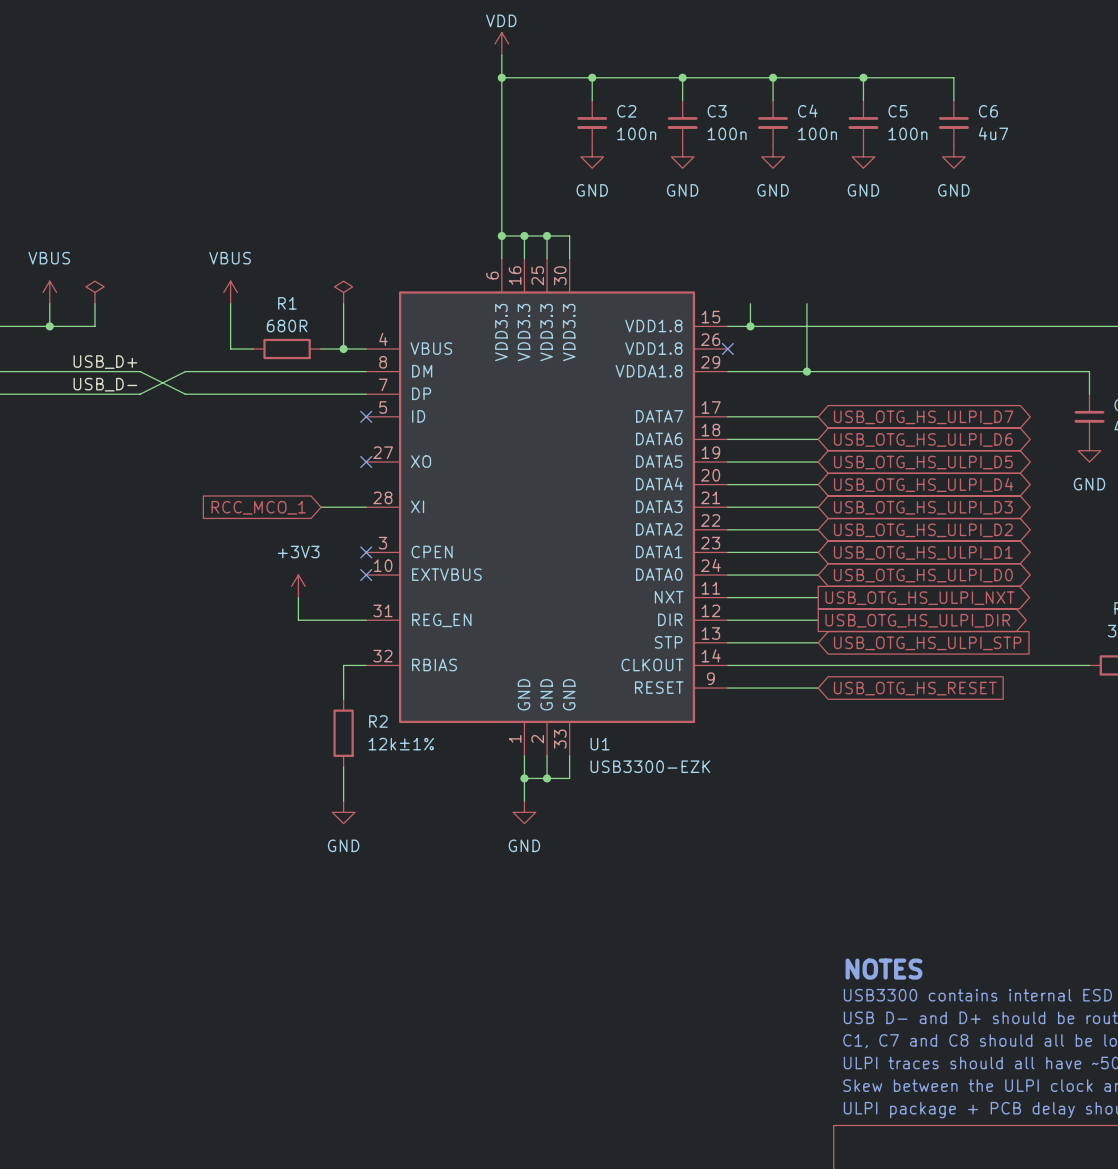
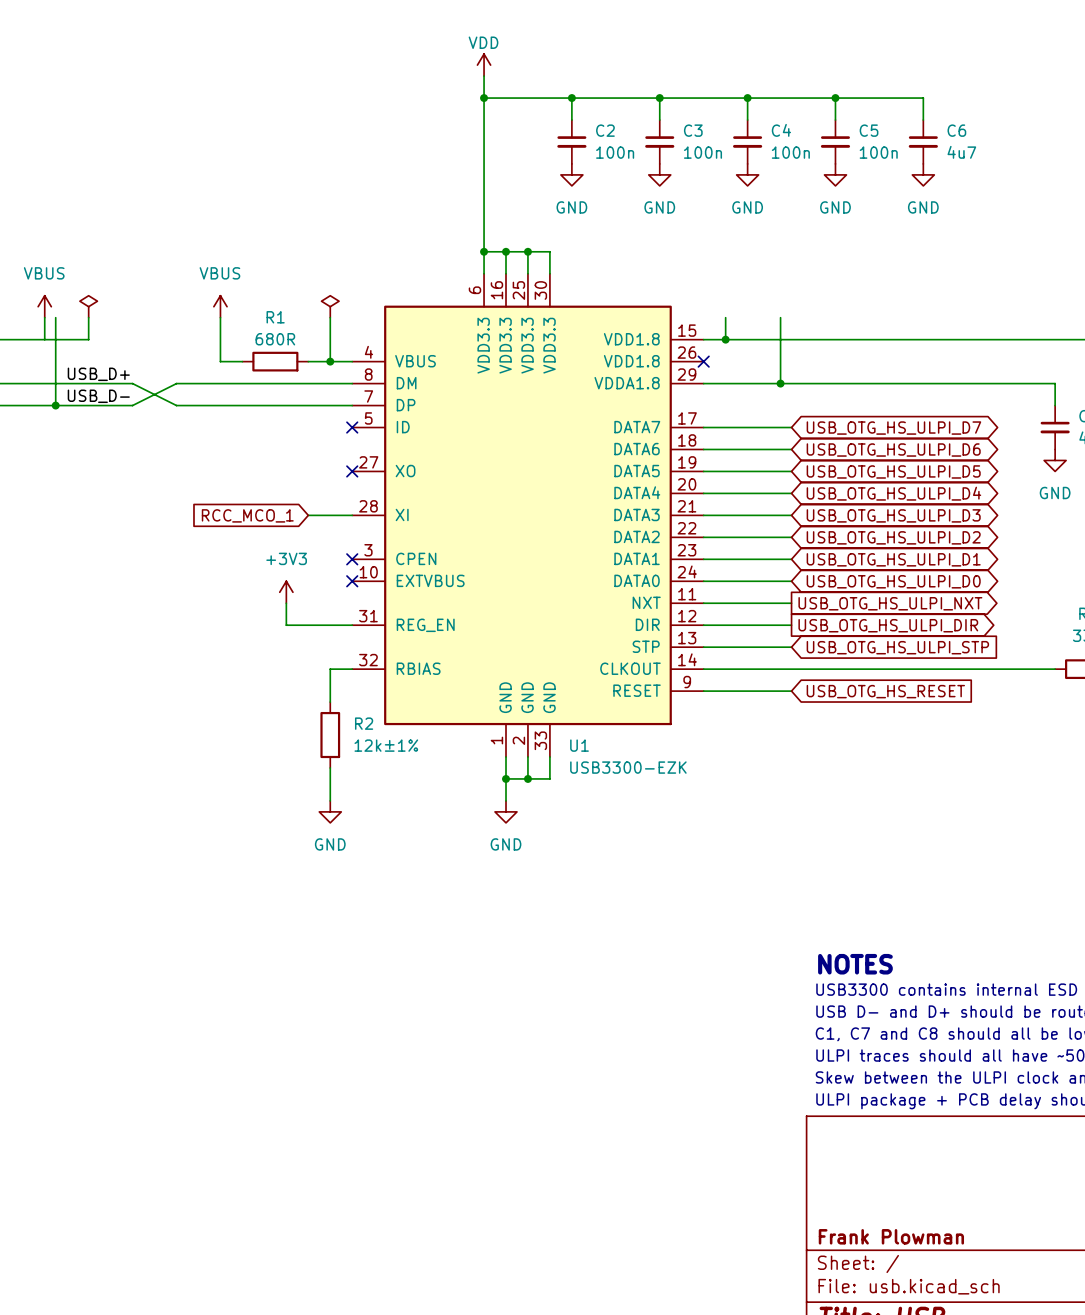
wire: none -> (55, 317) (55, 405)
junction: (49, 326) -> none
junction: none -> (55, 405)

